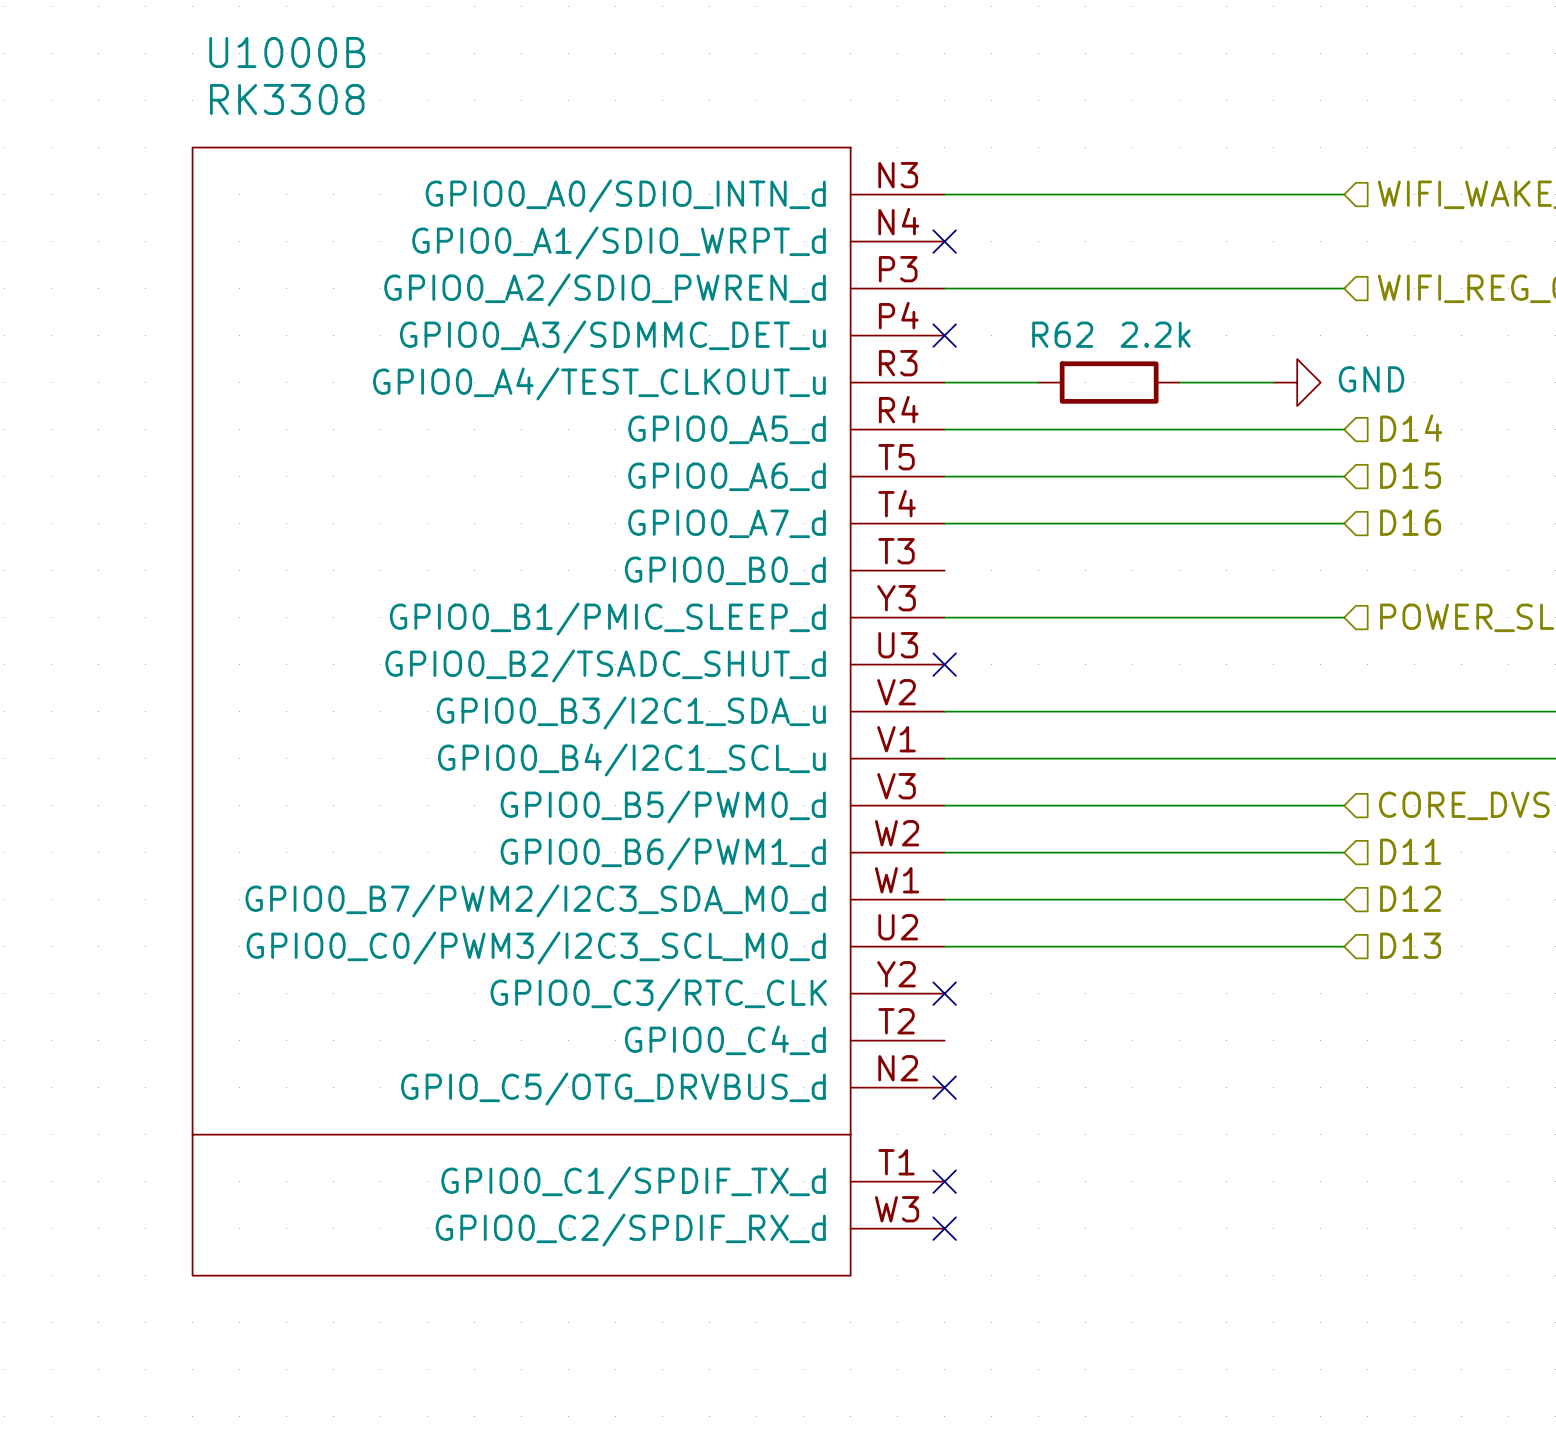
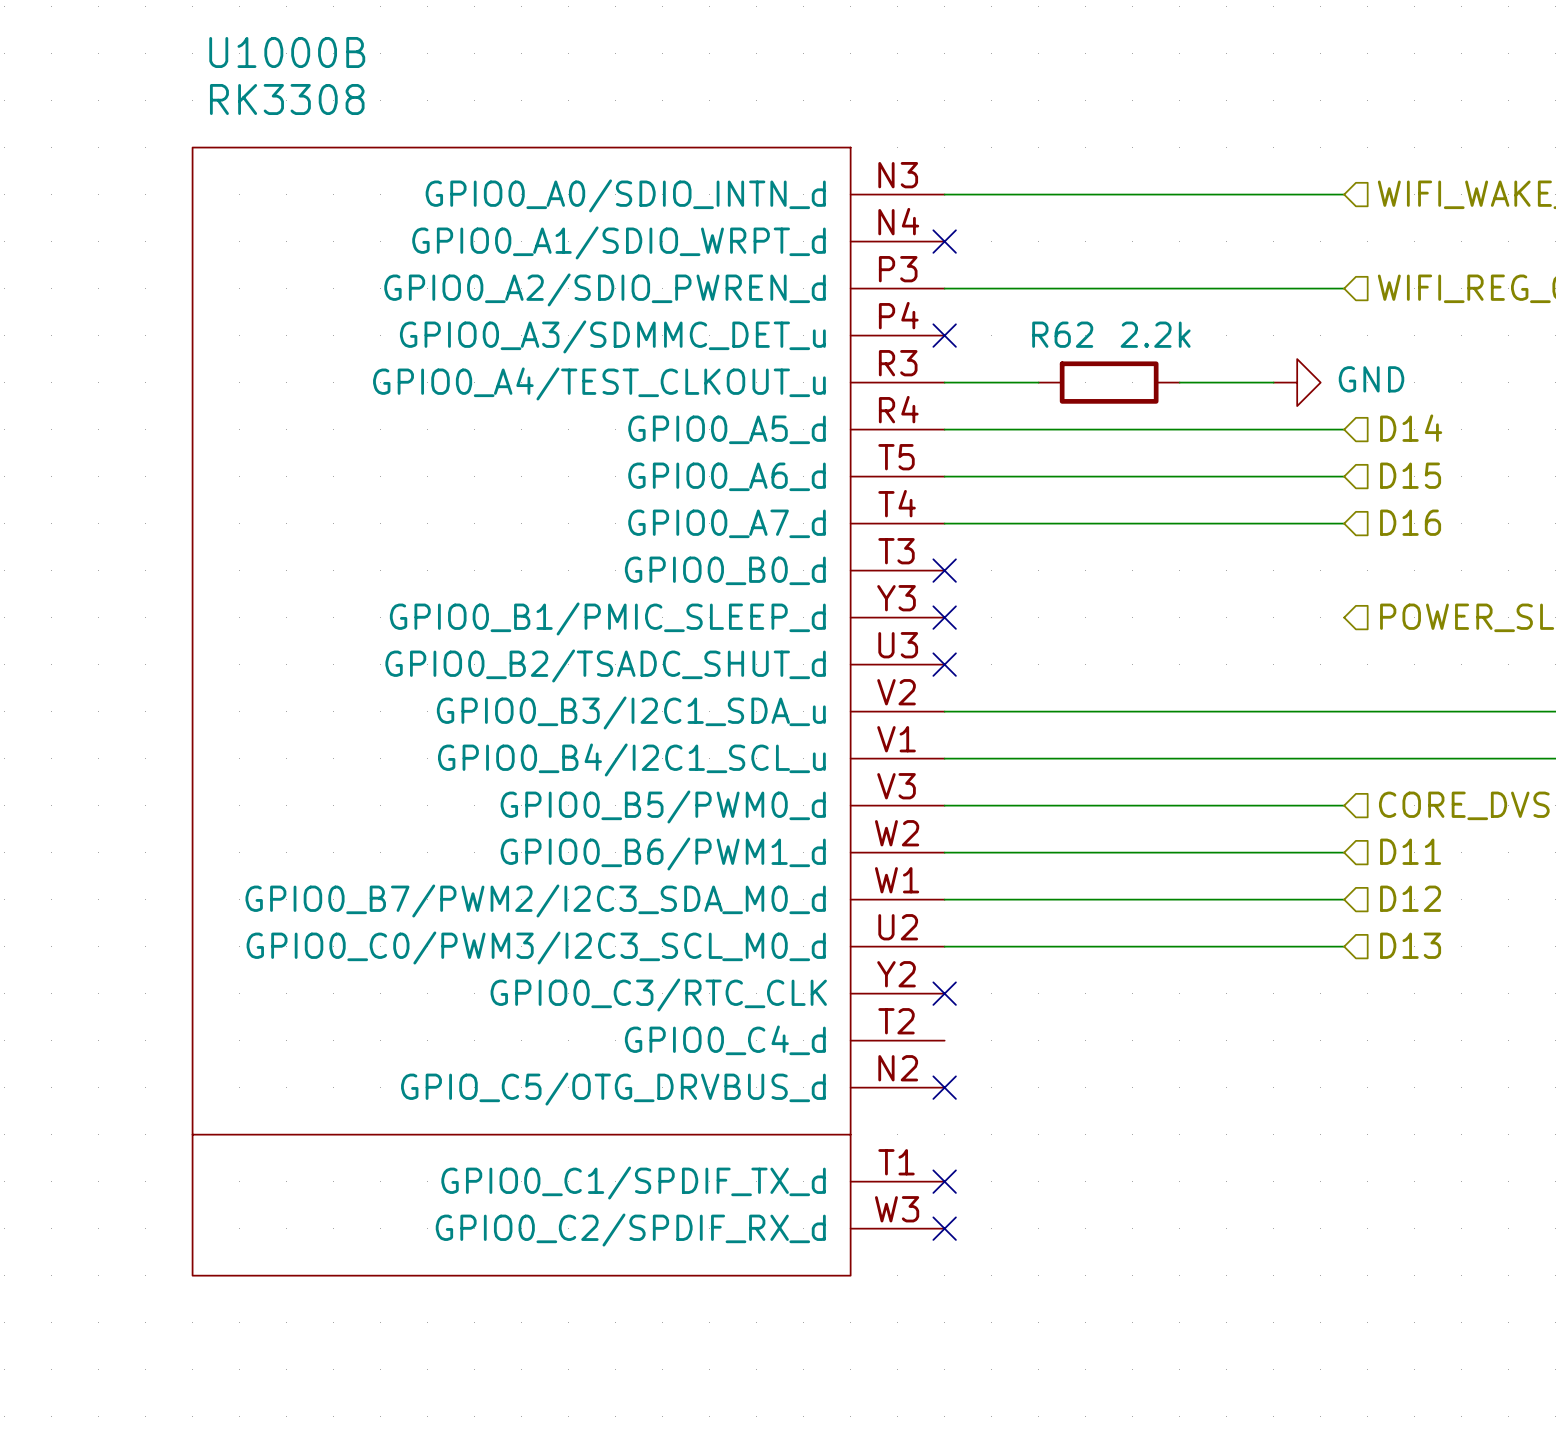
no-connect mark: none -> (944, 570)
wire: (944, 617) (1344, 617) -> none
no-connect mark: none -> (944, 617)

